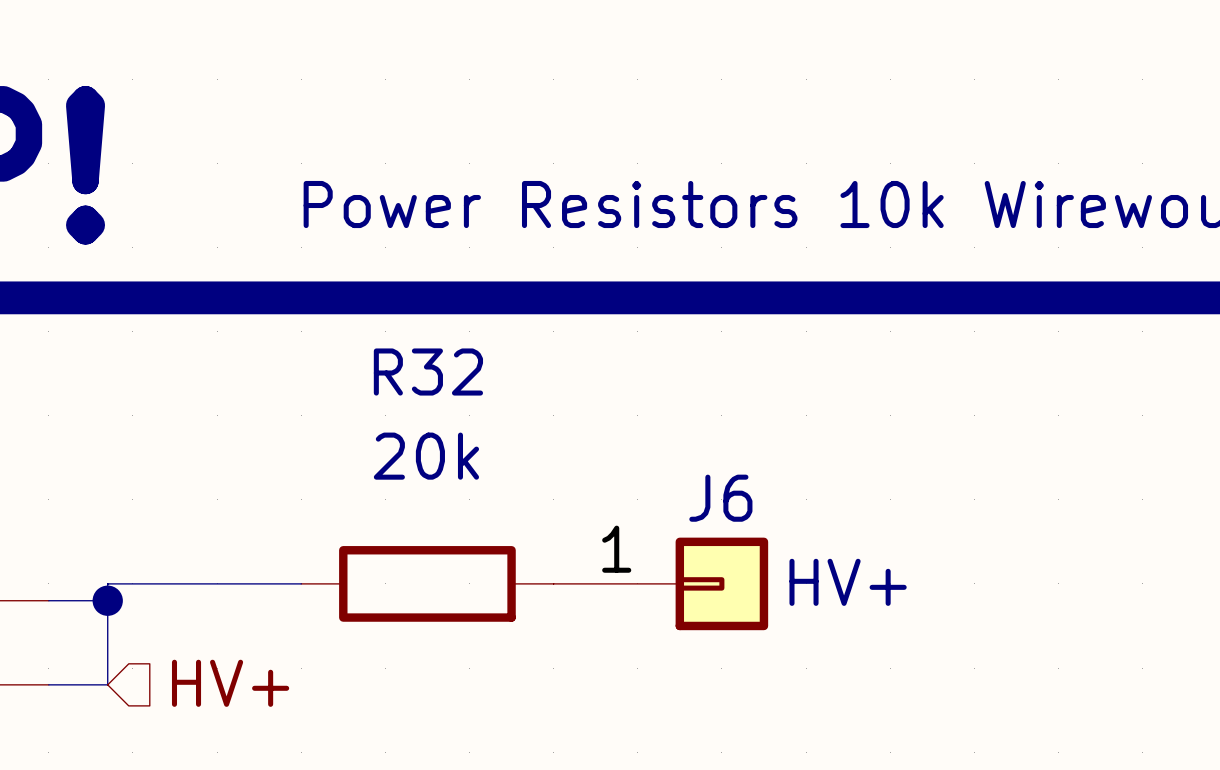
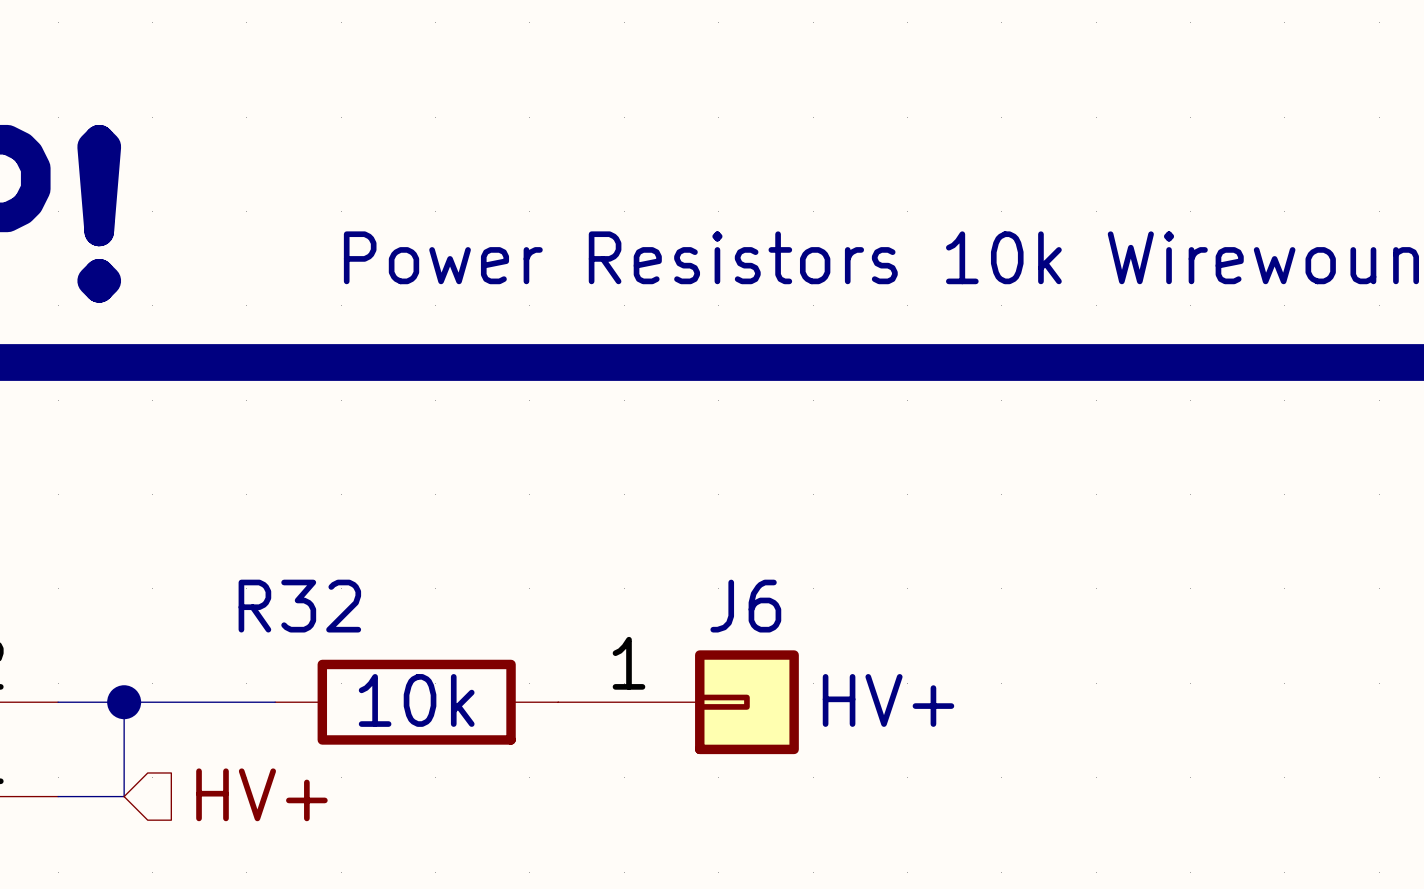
R32 name position: R32 (428, 372) -> R32 (299, 606)
R32 value: 20k (426, 456) -> 10k (416, 700)
wire: (301, 583) (107, 583) (107, 600) -> (275, 702) (124, 702)
R32 position: (427, 583) -> (416, 702)
J6 position: (660, 583) -> (678, 702)

